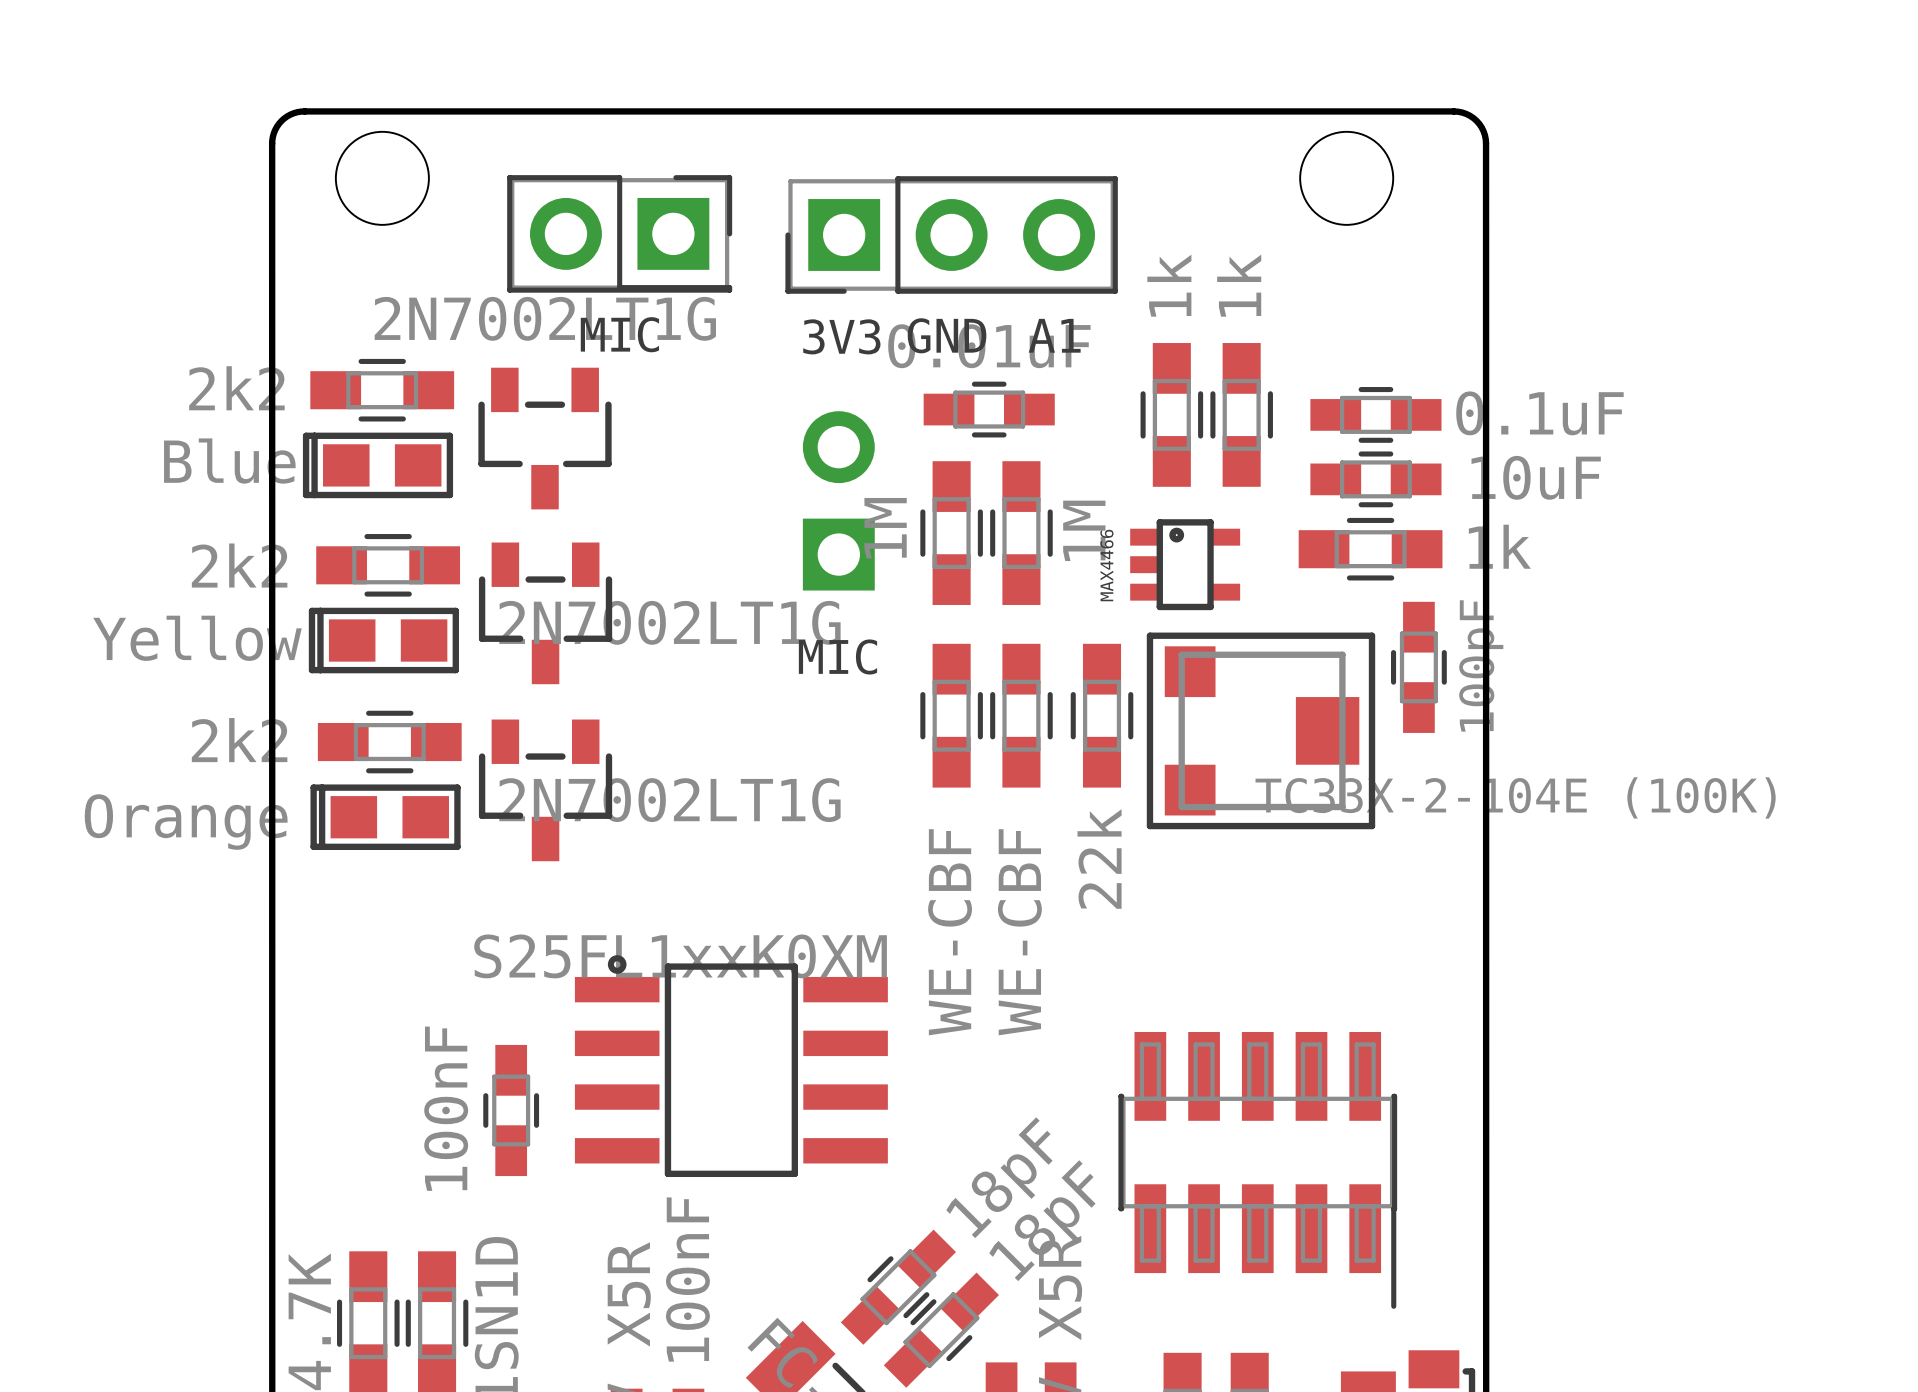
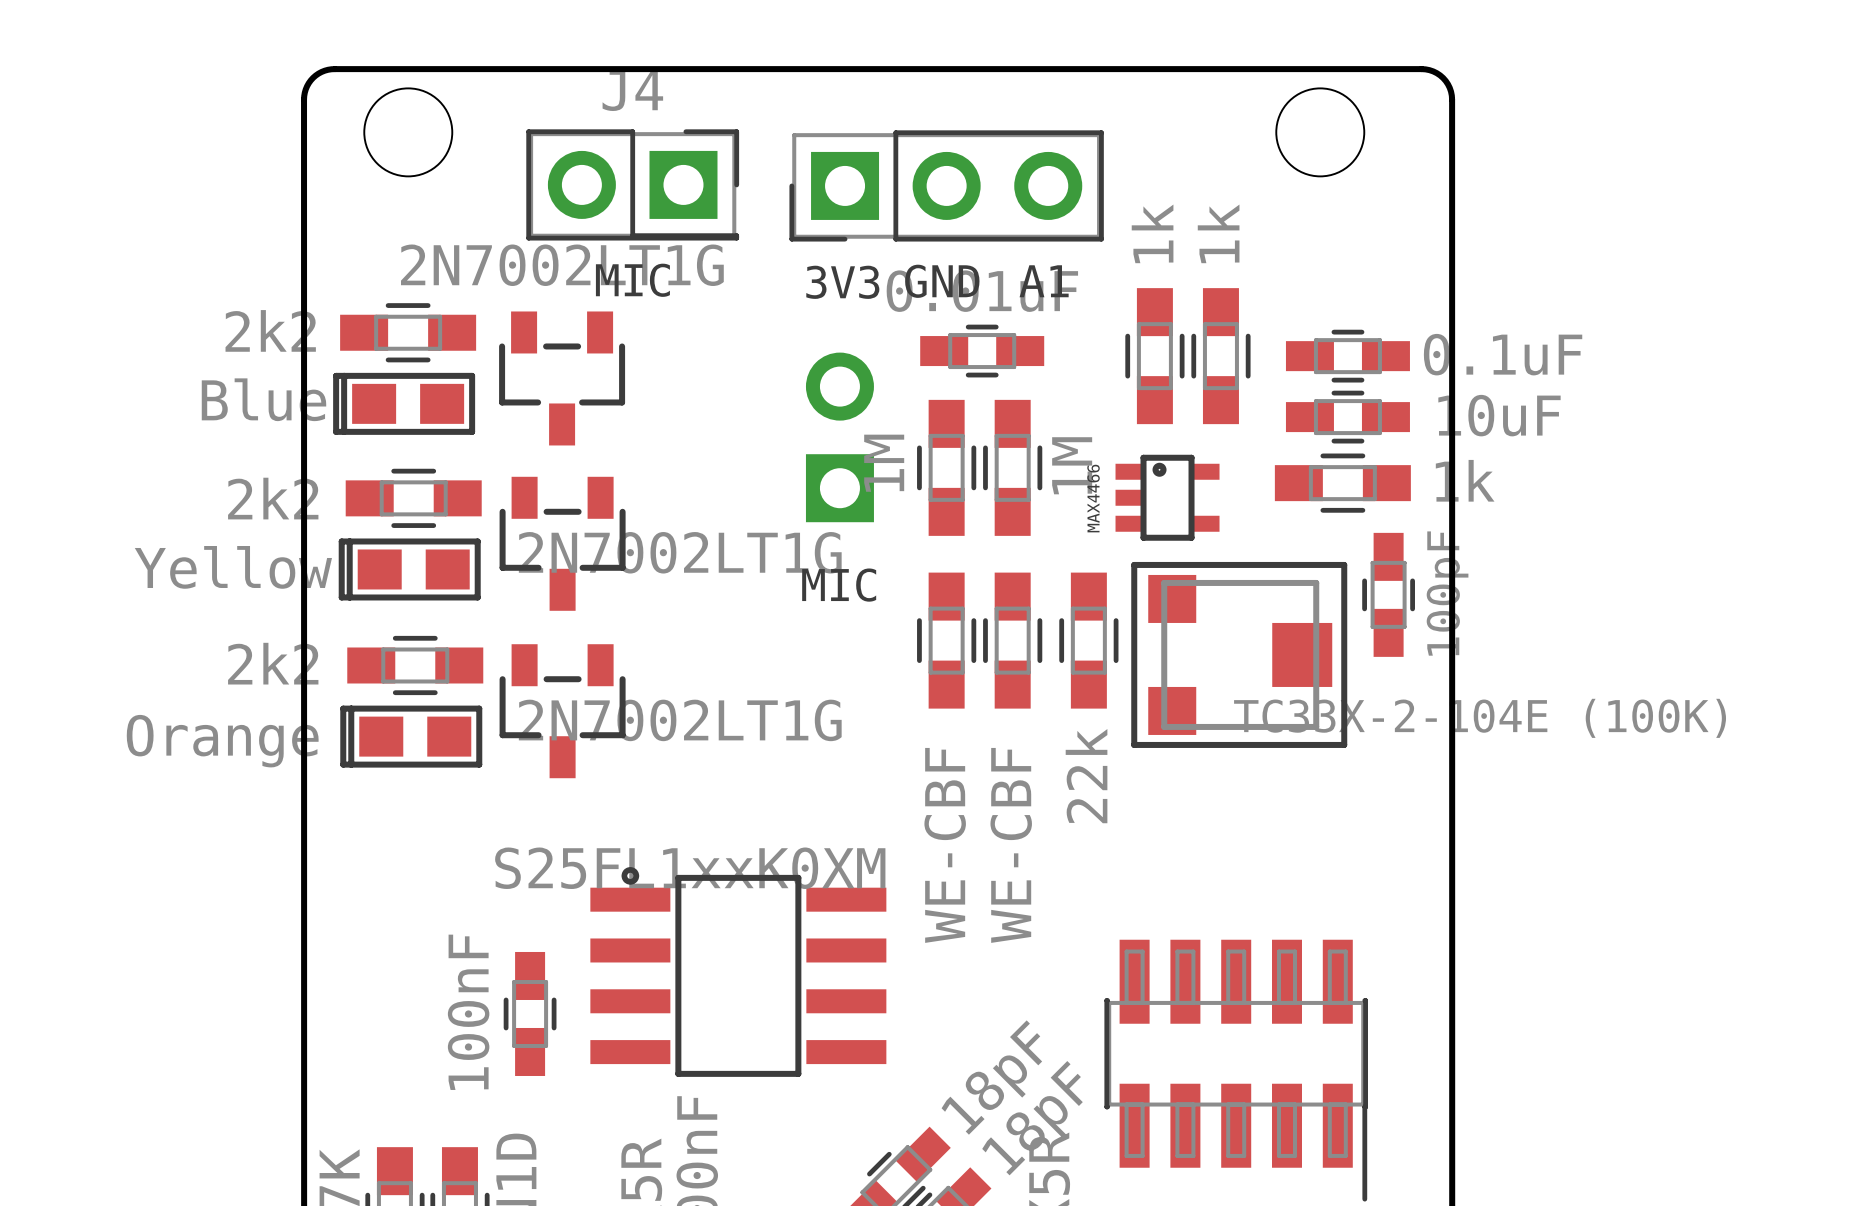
J4 name: none -> J4 (632, 90)

